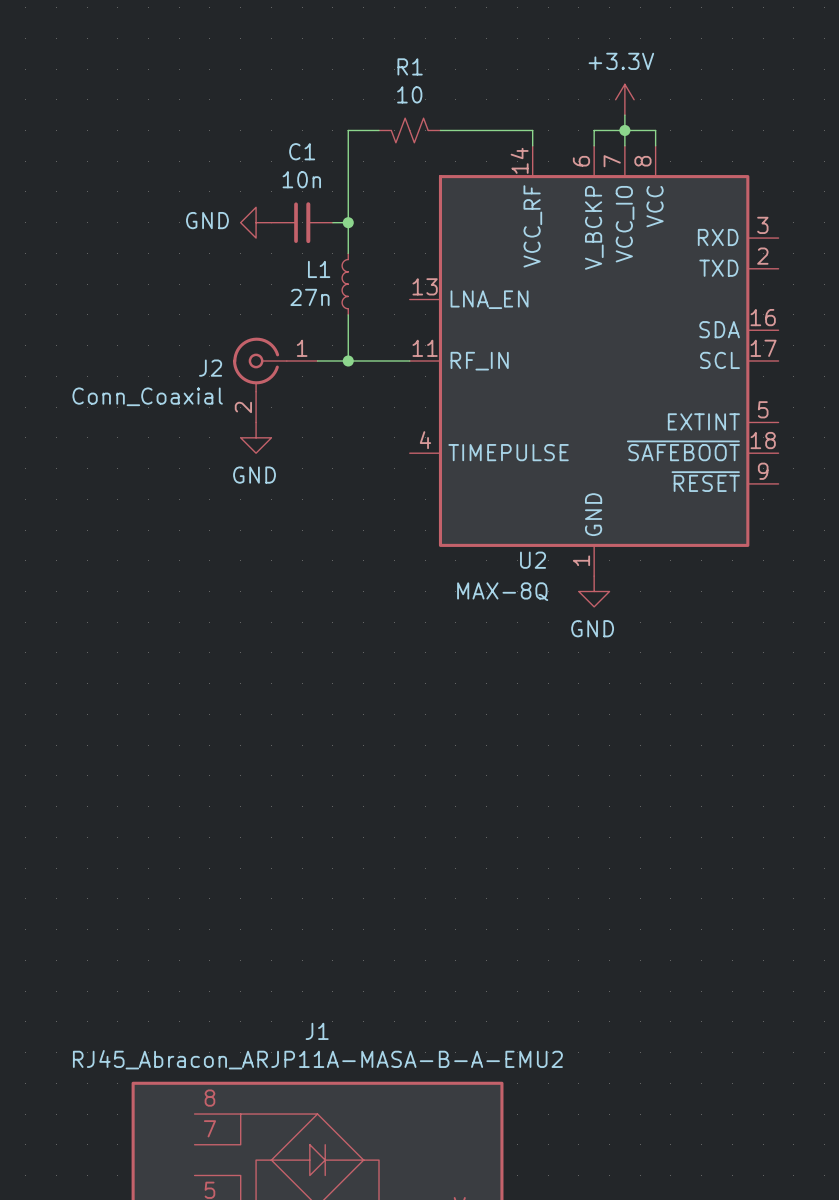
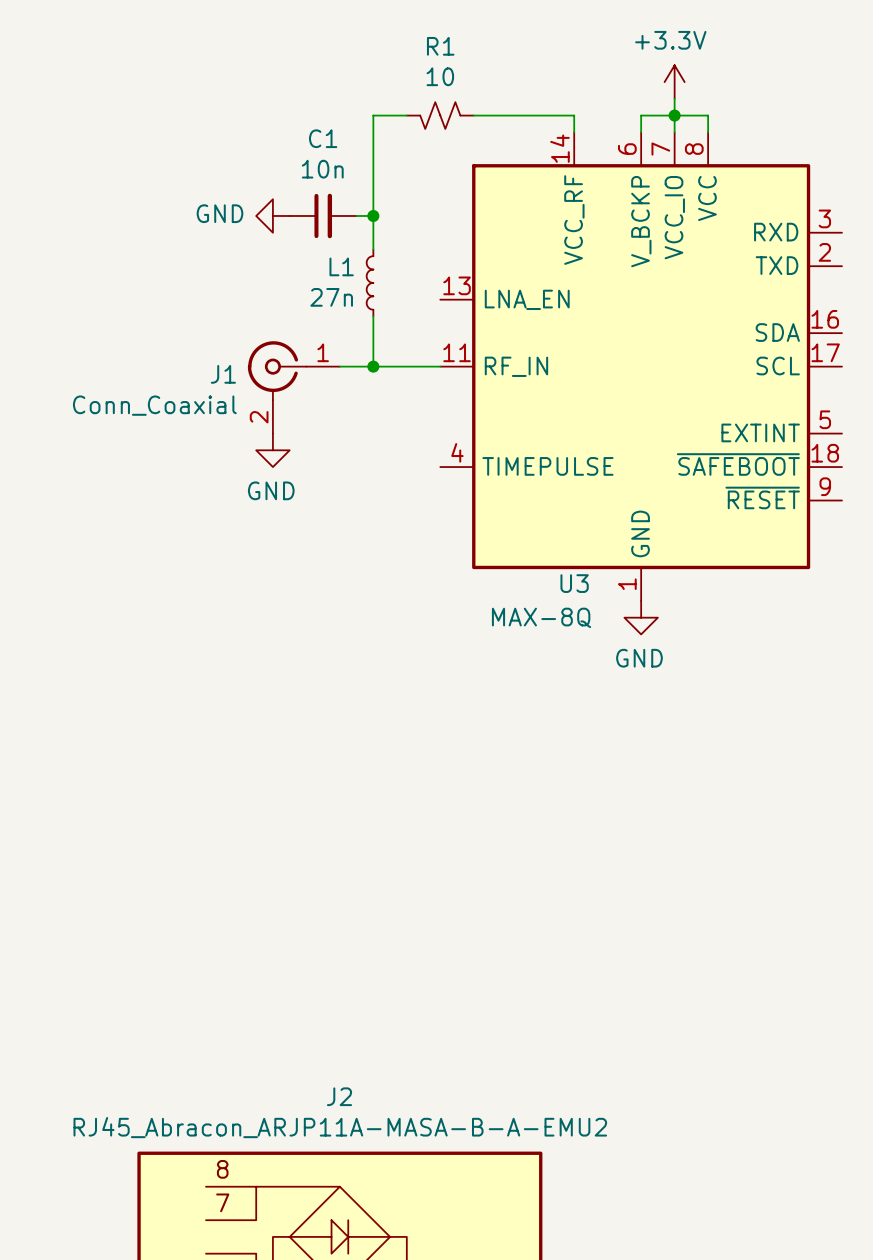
J2 name: J2 (210, 368) -> J1 (223, 374)
U2 name: U2 (533, 560) -> U3 (574, 583)
J1 name: J1 (317, 1031) -> J2 (339, 1096)

